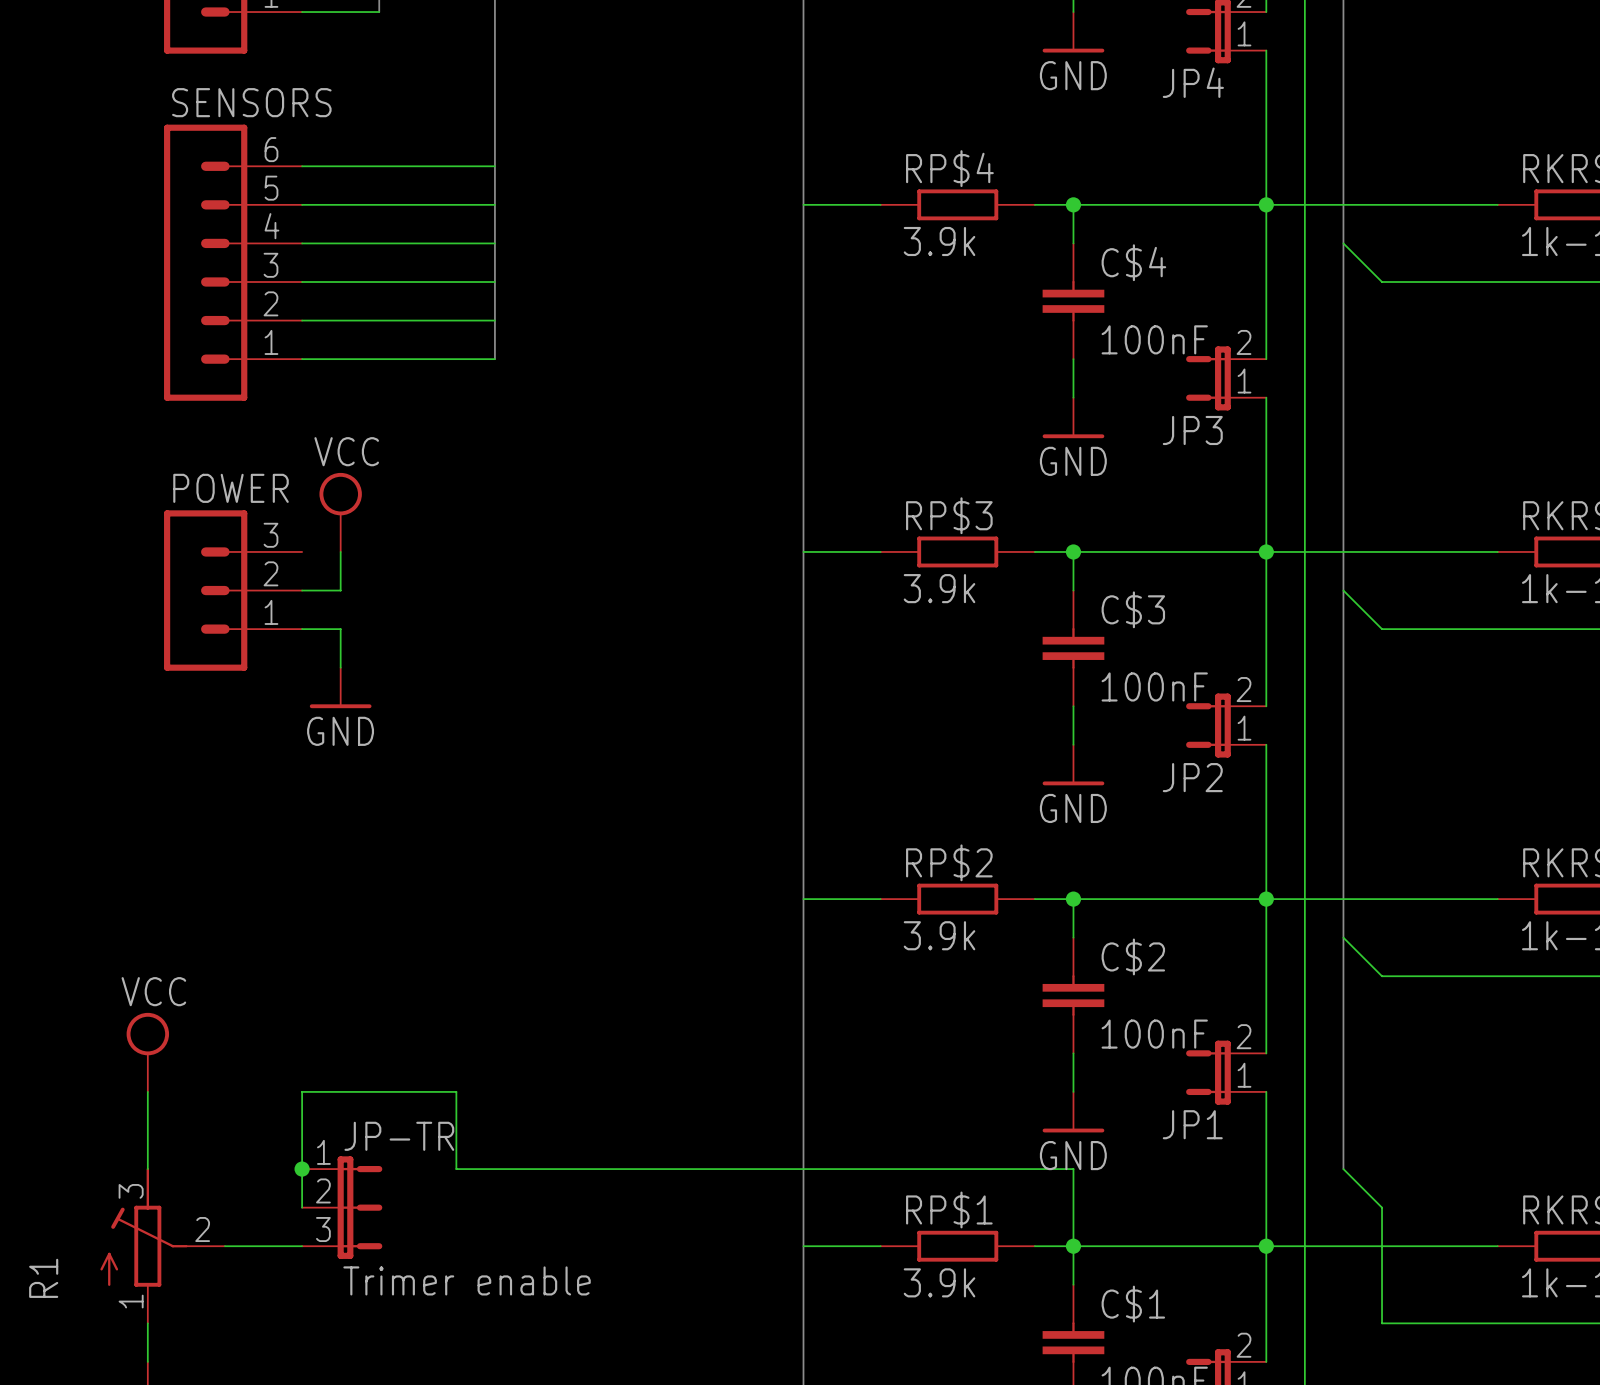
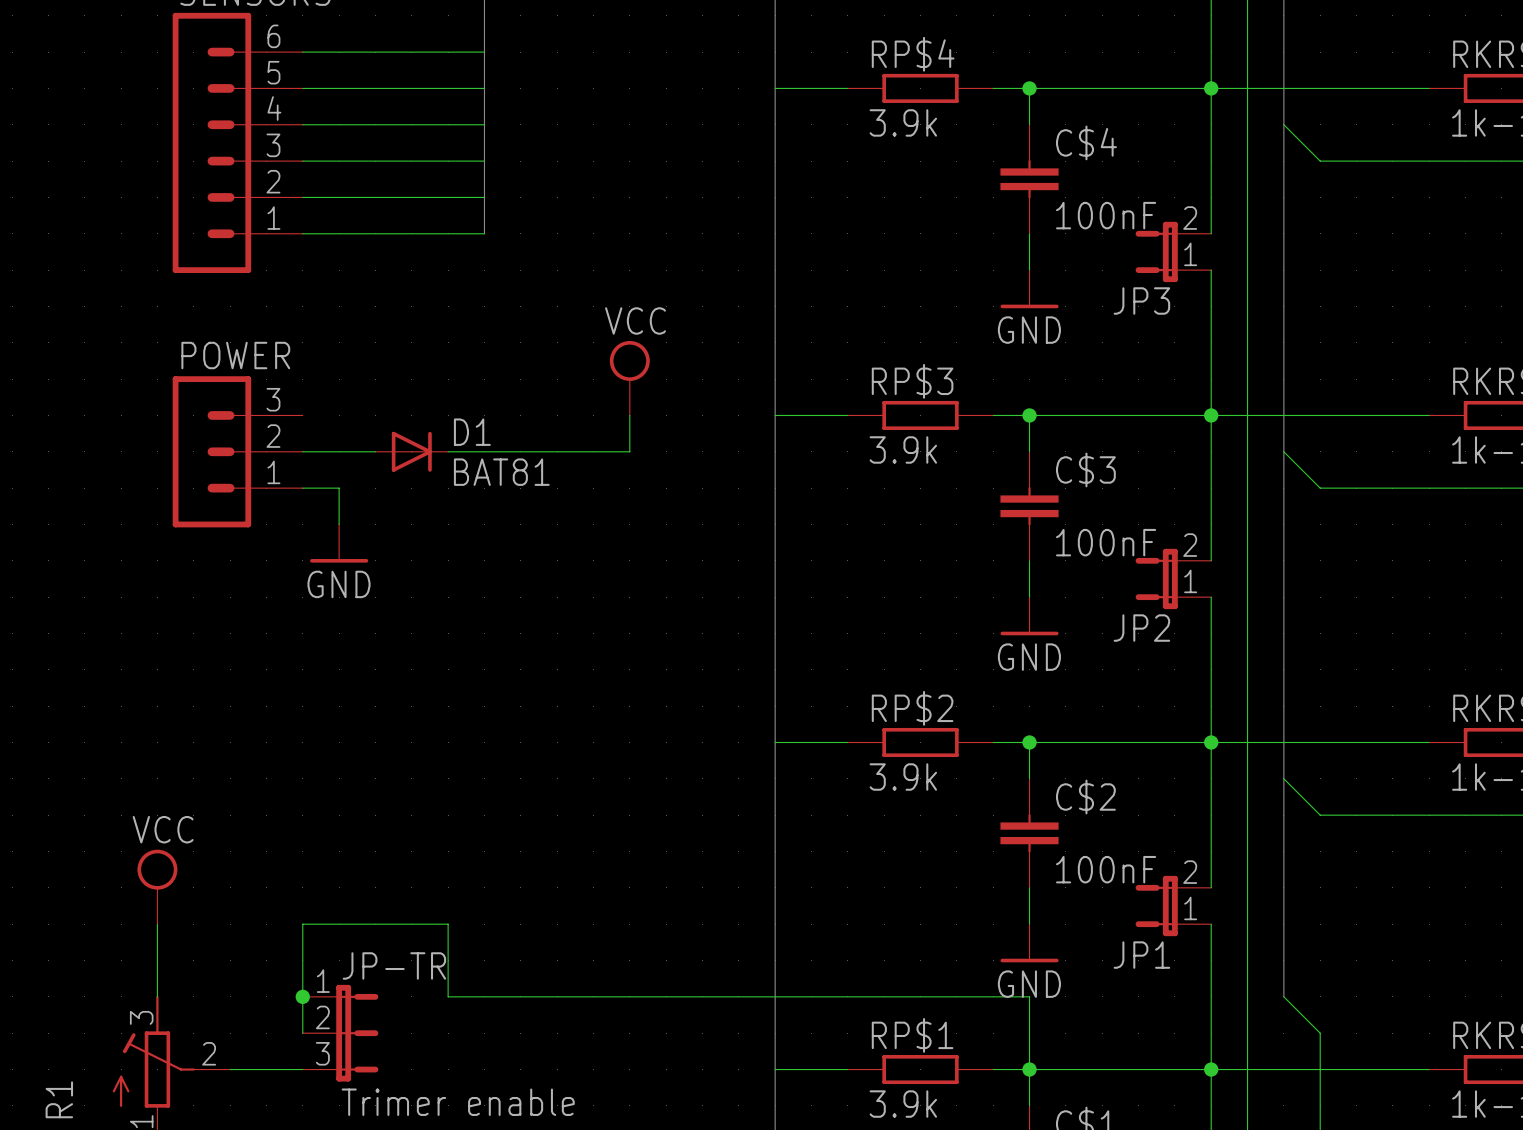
power symbol position: VCC (340, 512) -> VCC (629, 378)
wire: (340, 551) (340, 590) -> (375, 451) (339, 451)
wire: none -> (629, 415) (629, 451) (448, 451)
D1: none -> BAT81 (411, 451)

